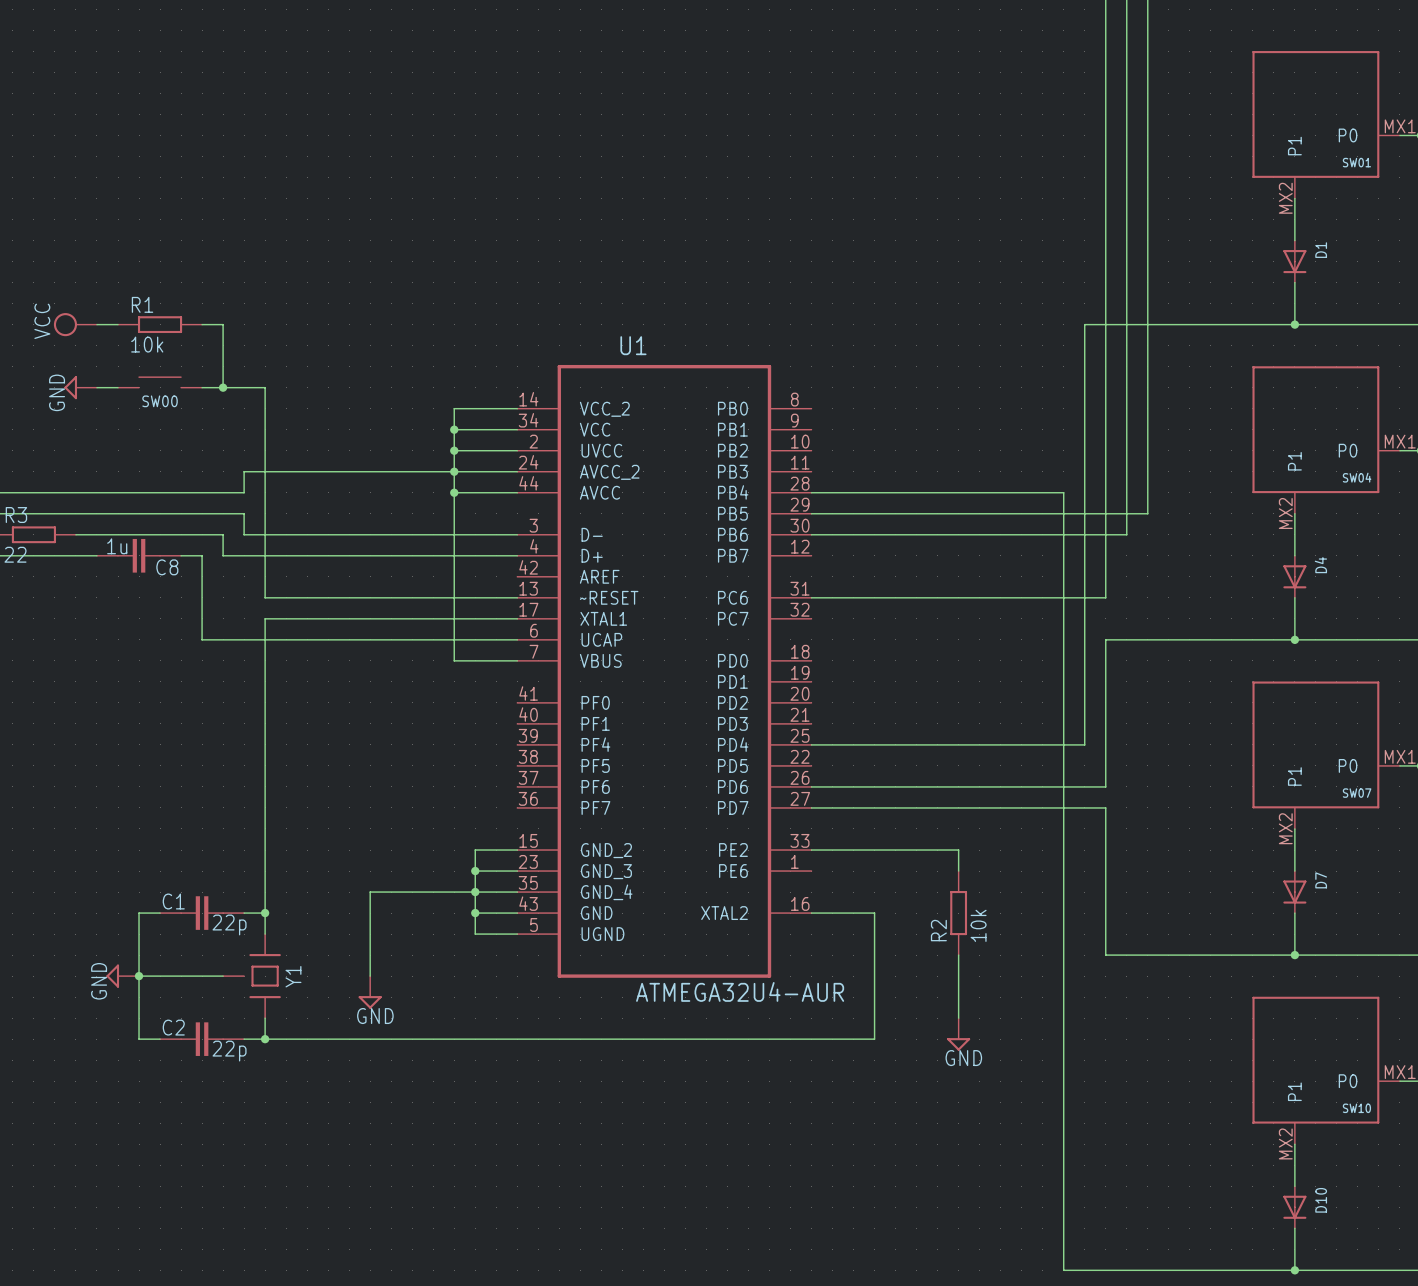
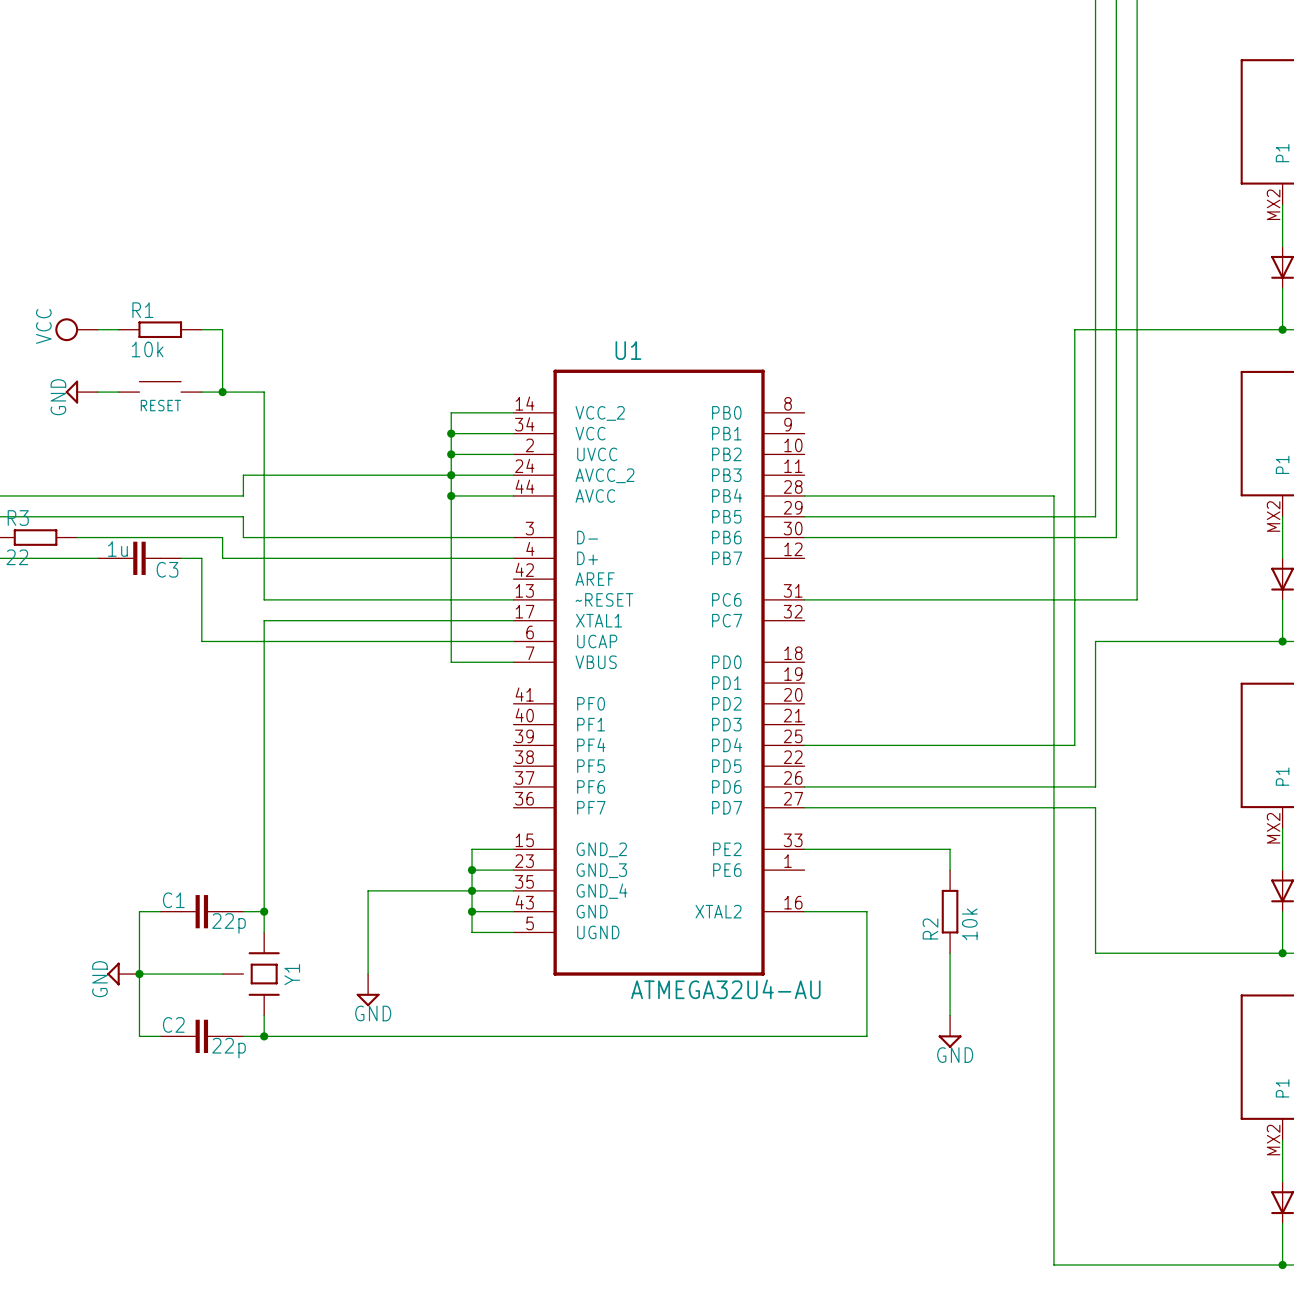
SW00 name: SW00 (160, 401) -> RESET (160, 405)
wire: (1147, 513) (1105, 513) (1105, 597) -> (1137, 516) (1137, 599) (1095, 599)
C8 name: C8 (167, 567) -> C3 (167, 569)
U1 value: ATMEGA32U4-AUR (740, 991) -> ATMEGA32U4-AU (725, 989)

